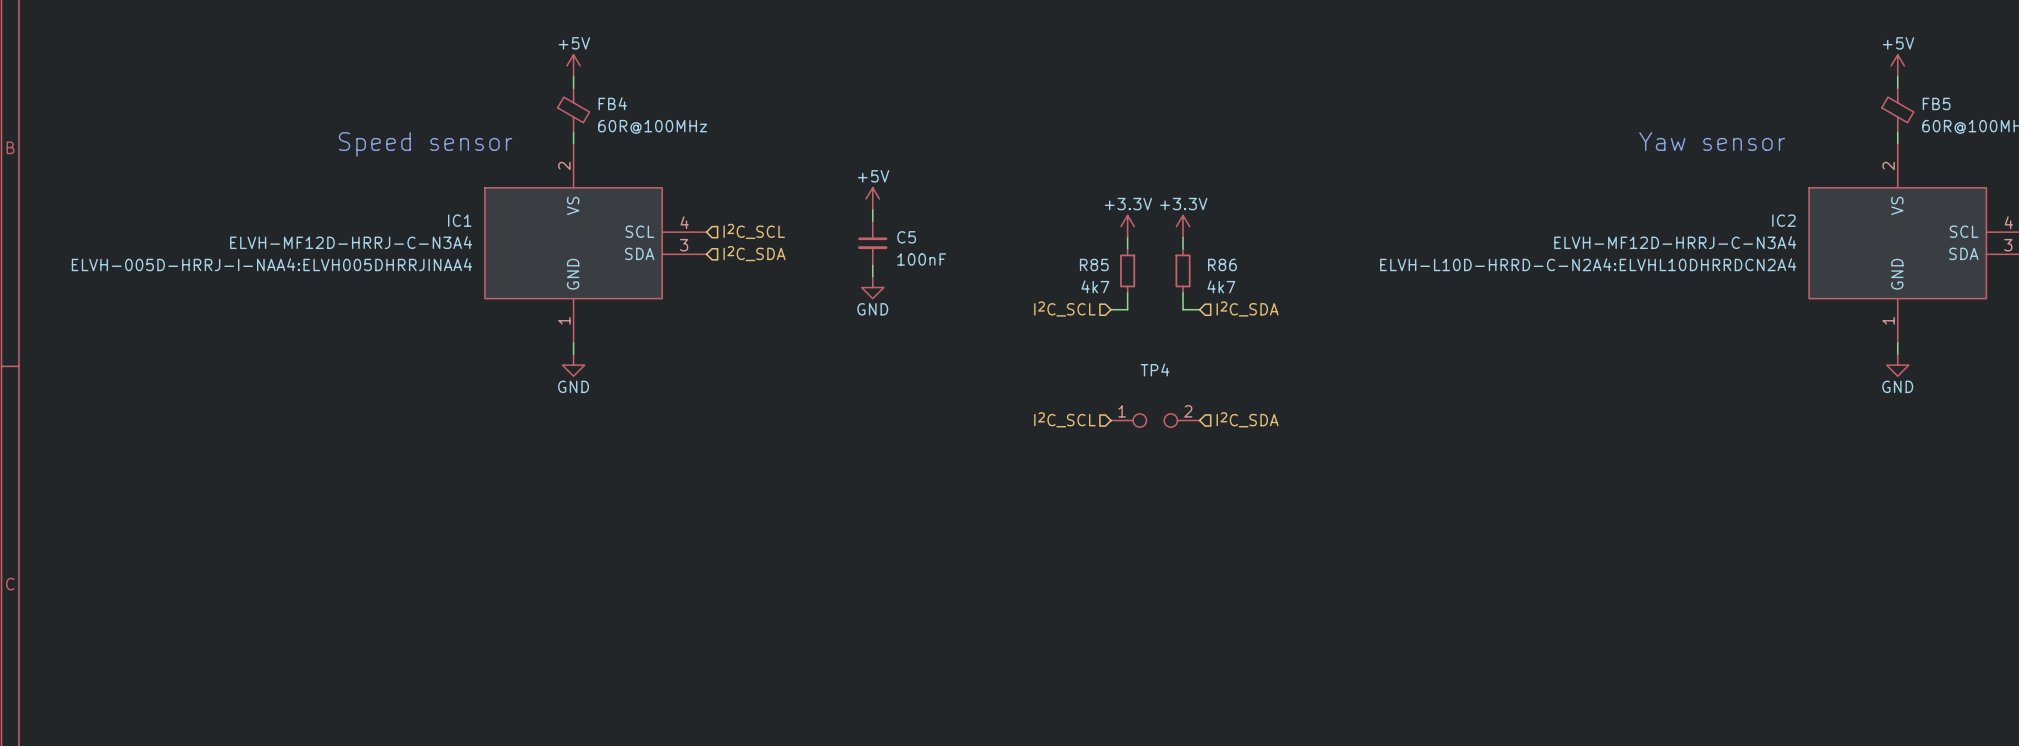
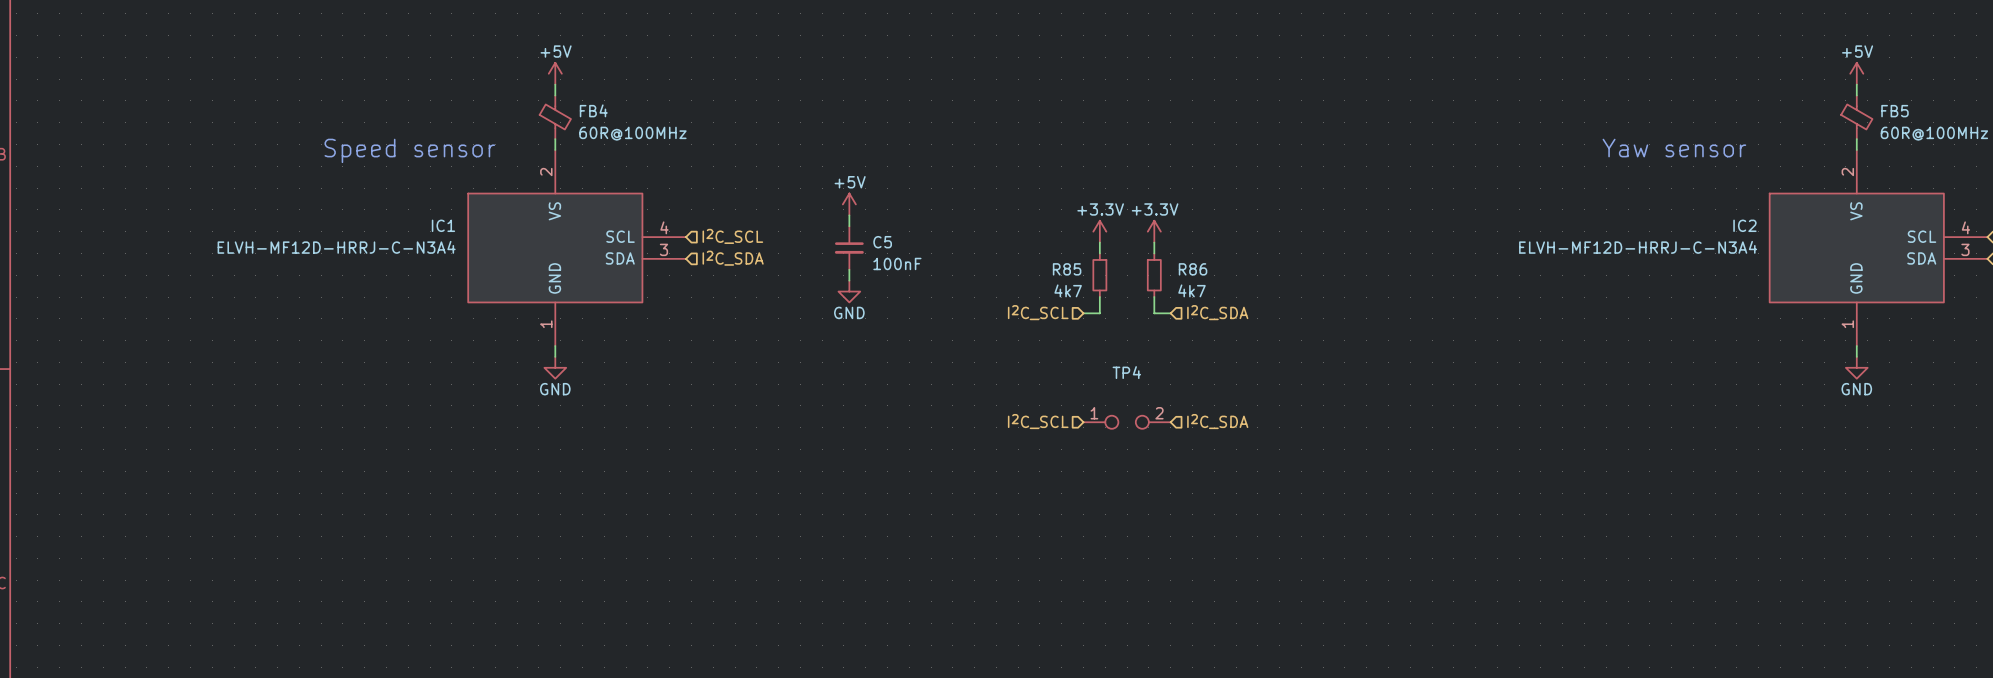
IC1 text: ELVH-005D-HRRJ-I-NAA4:ELVH005DHRRJINAA4 (271, 264) -> none
IC2 text: ELVH-L10D-HRRD-C-N2A4:ELVHL10DHRRDCN2A4 (1588, 264) -> none

